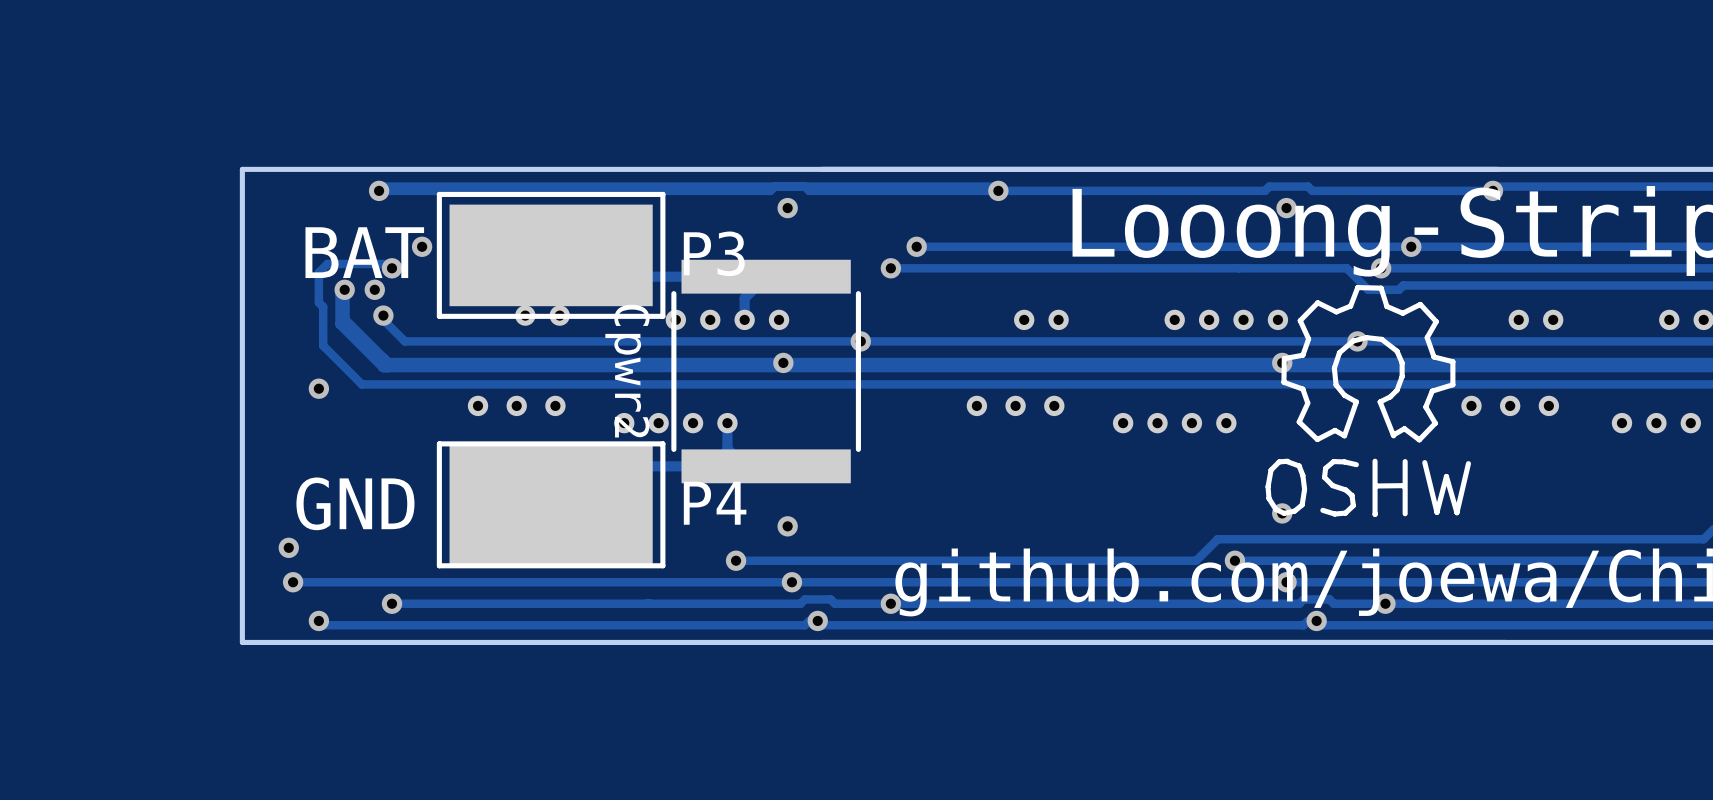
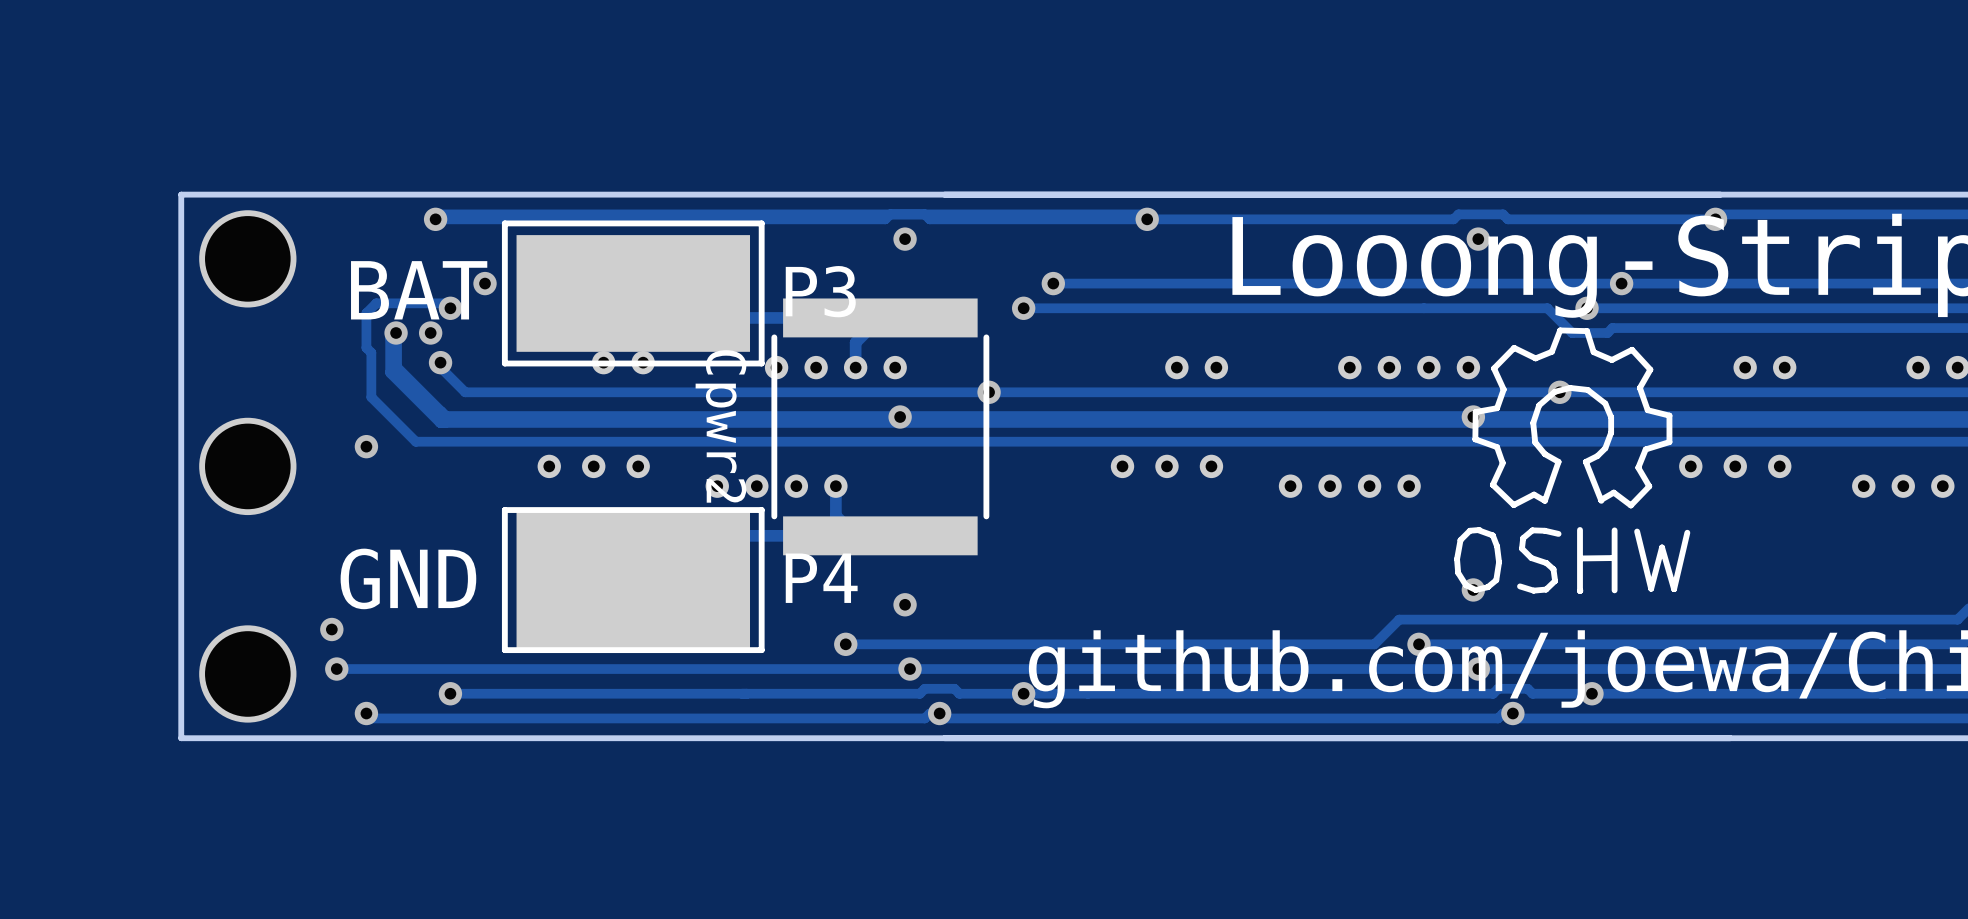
board edge: (242, 169) (242, 642) -> (278, 194) (181, 194) (181, 738) (278, 738)
part: none -> (247, 258)
part: none -> (247, 466)
part: none -> (247, 673)

